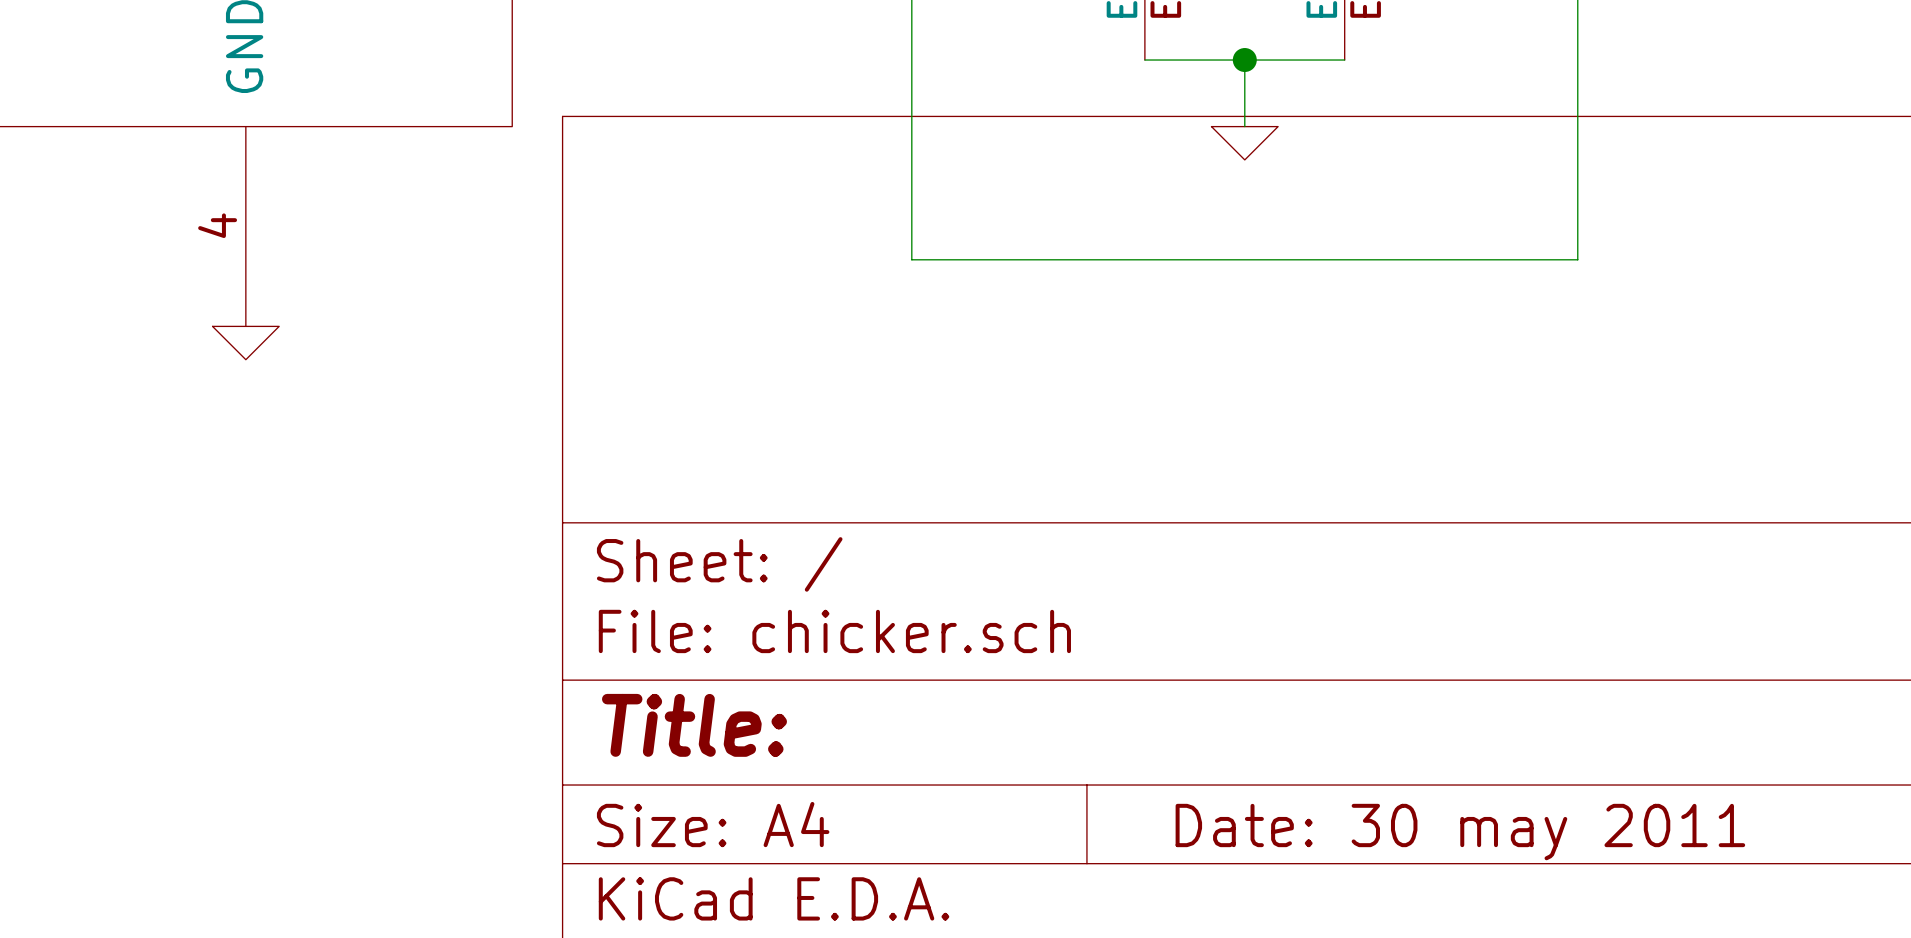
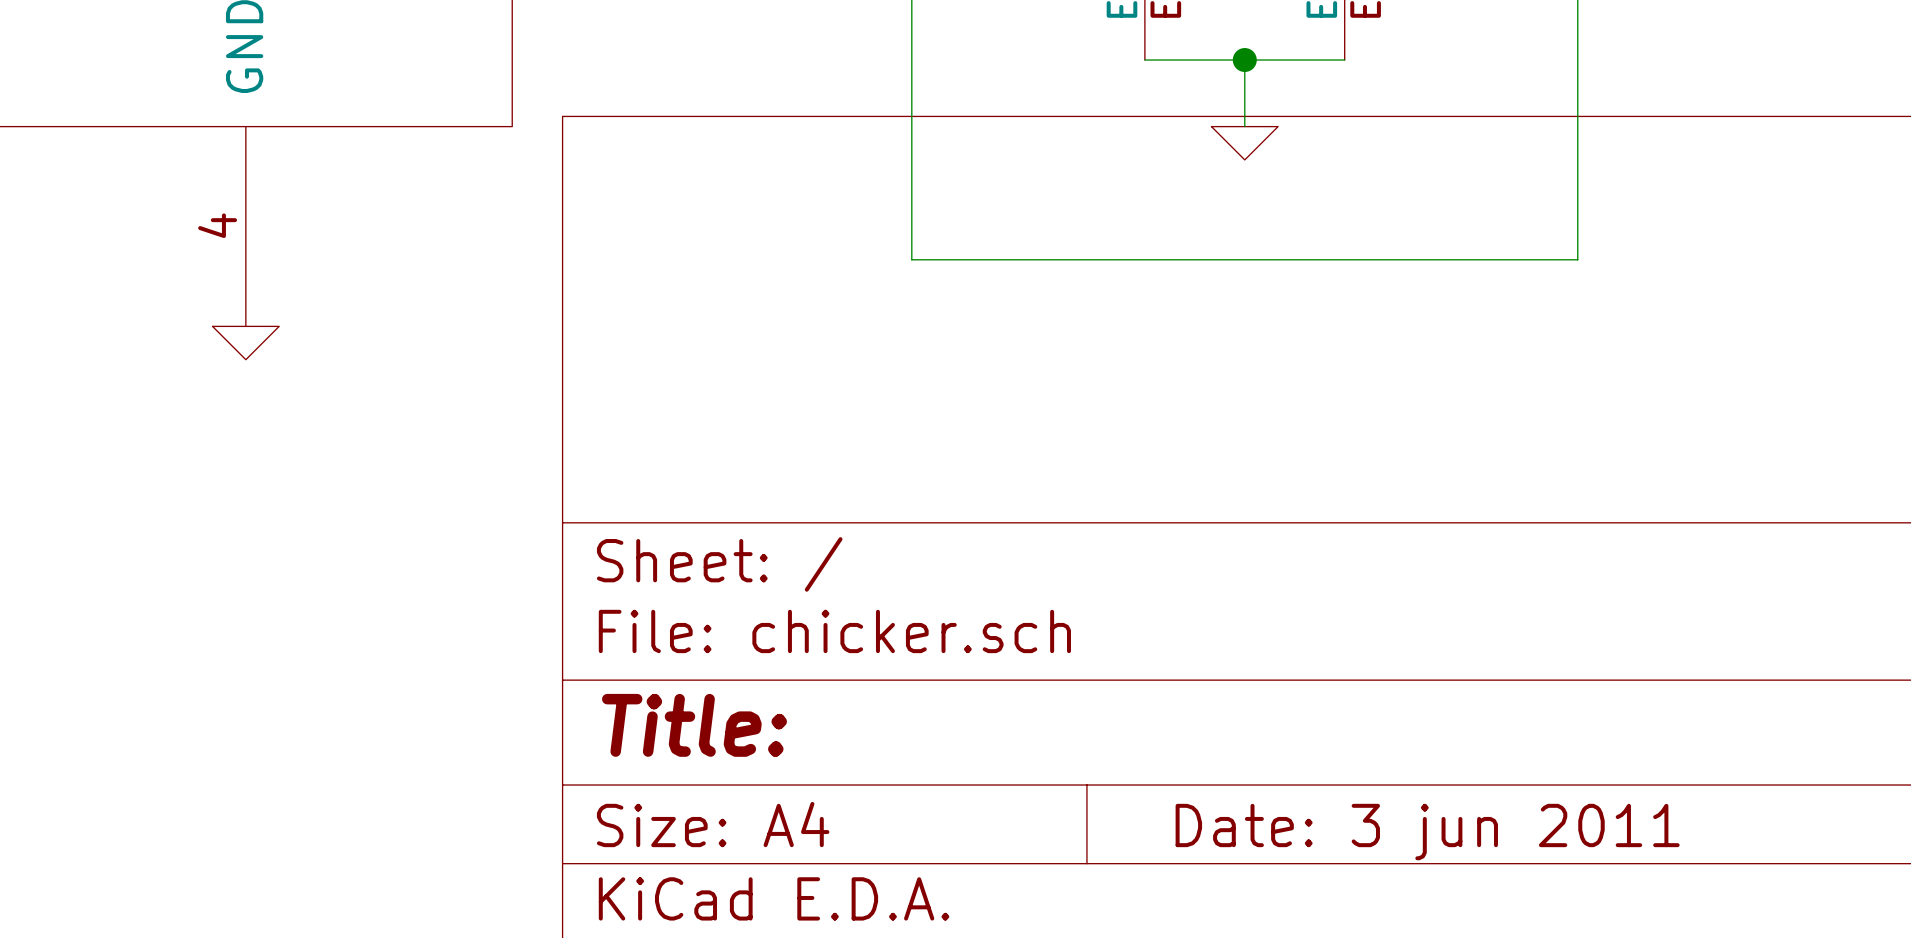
title block: Date: 30 may 2011 (1460, 832) -> Date: 3 jun 2011 (1427, 832)

